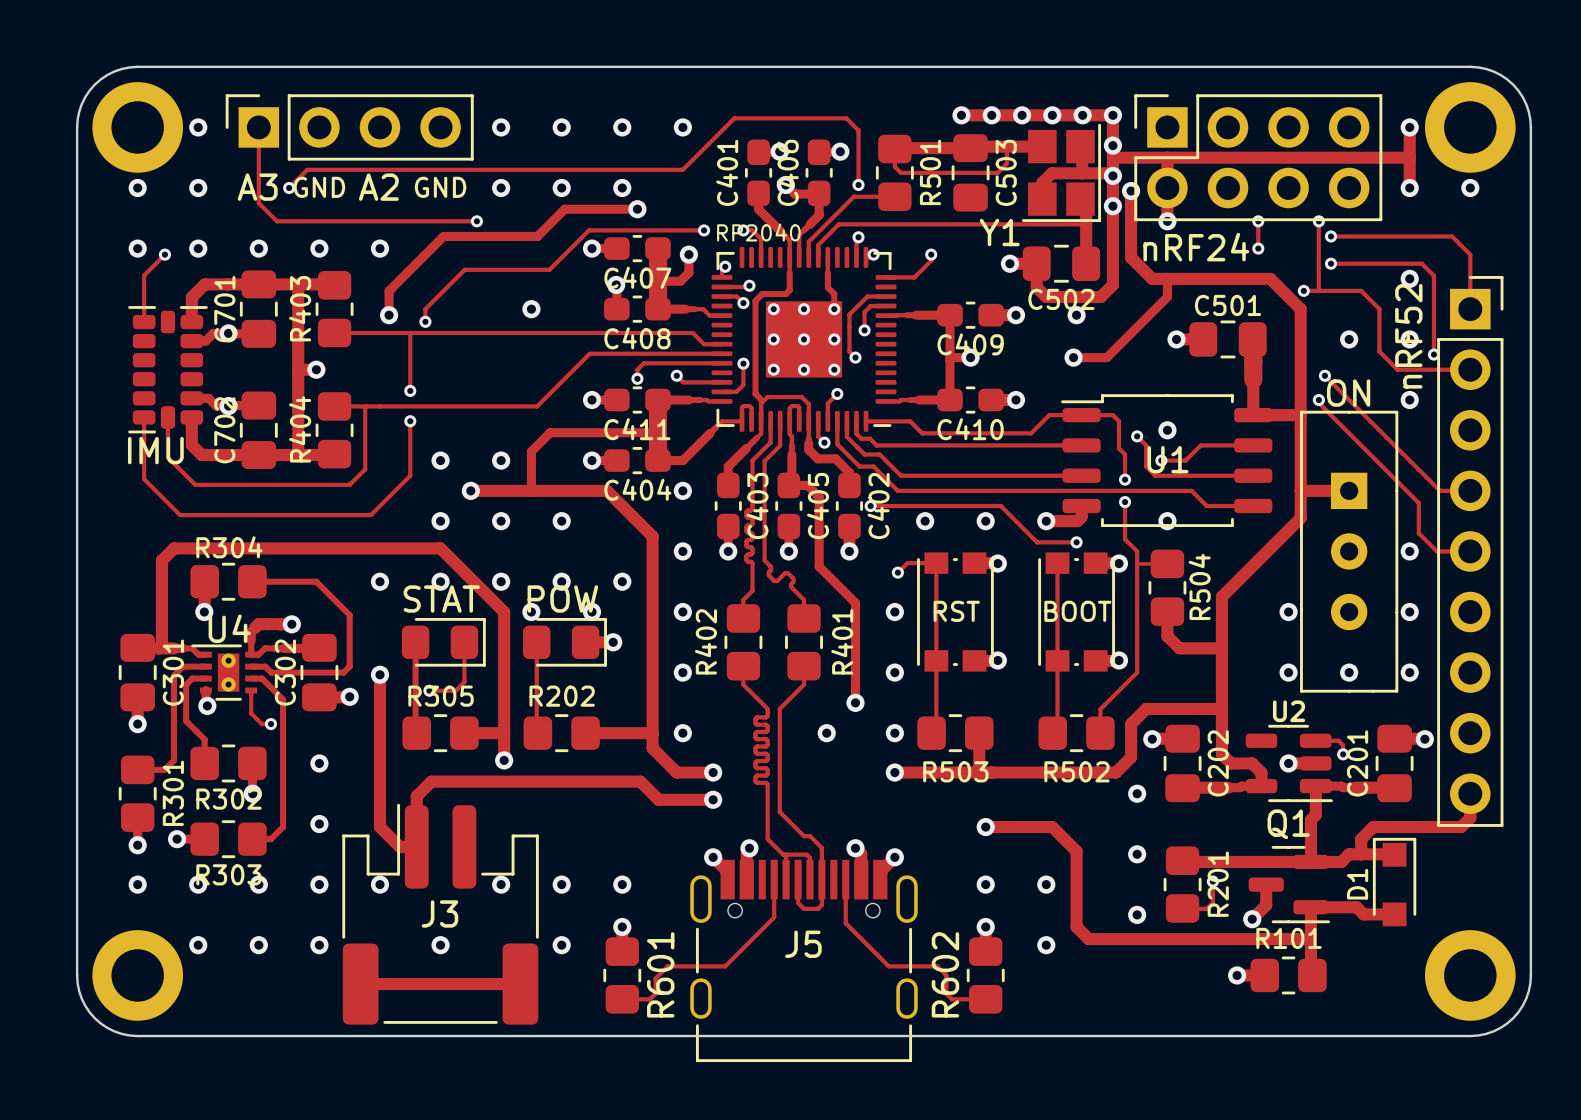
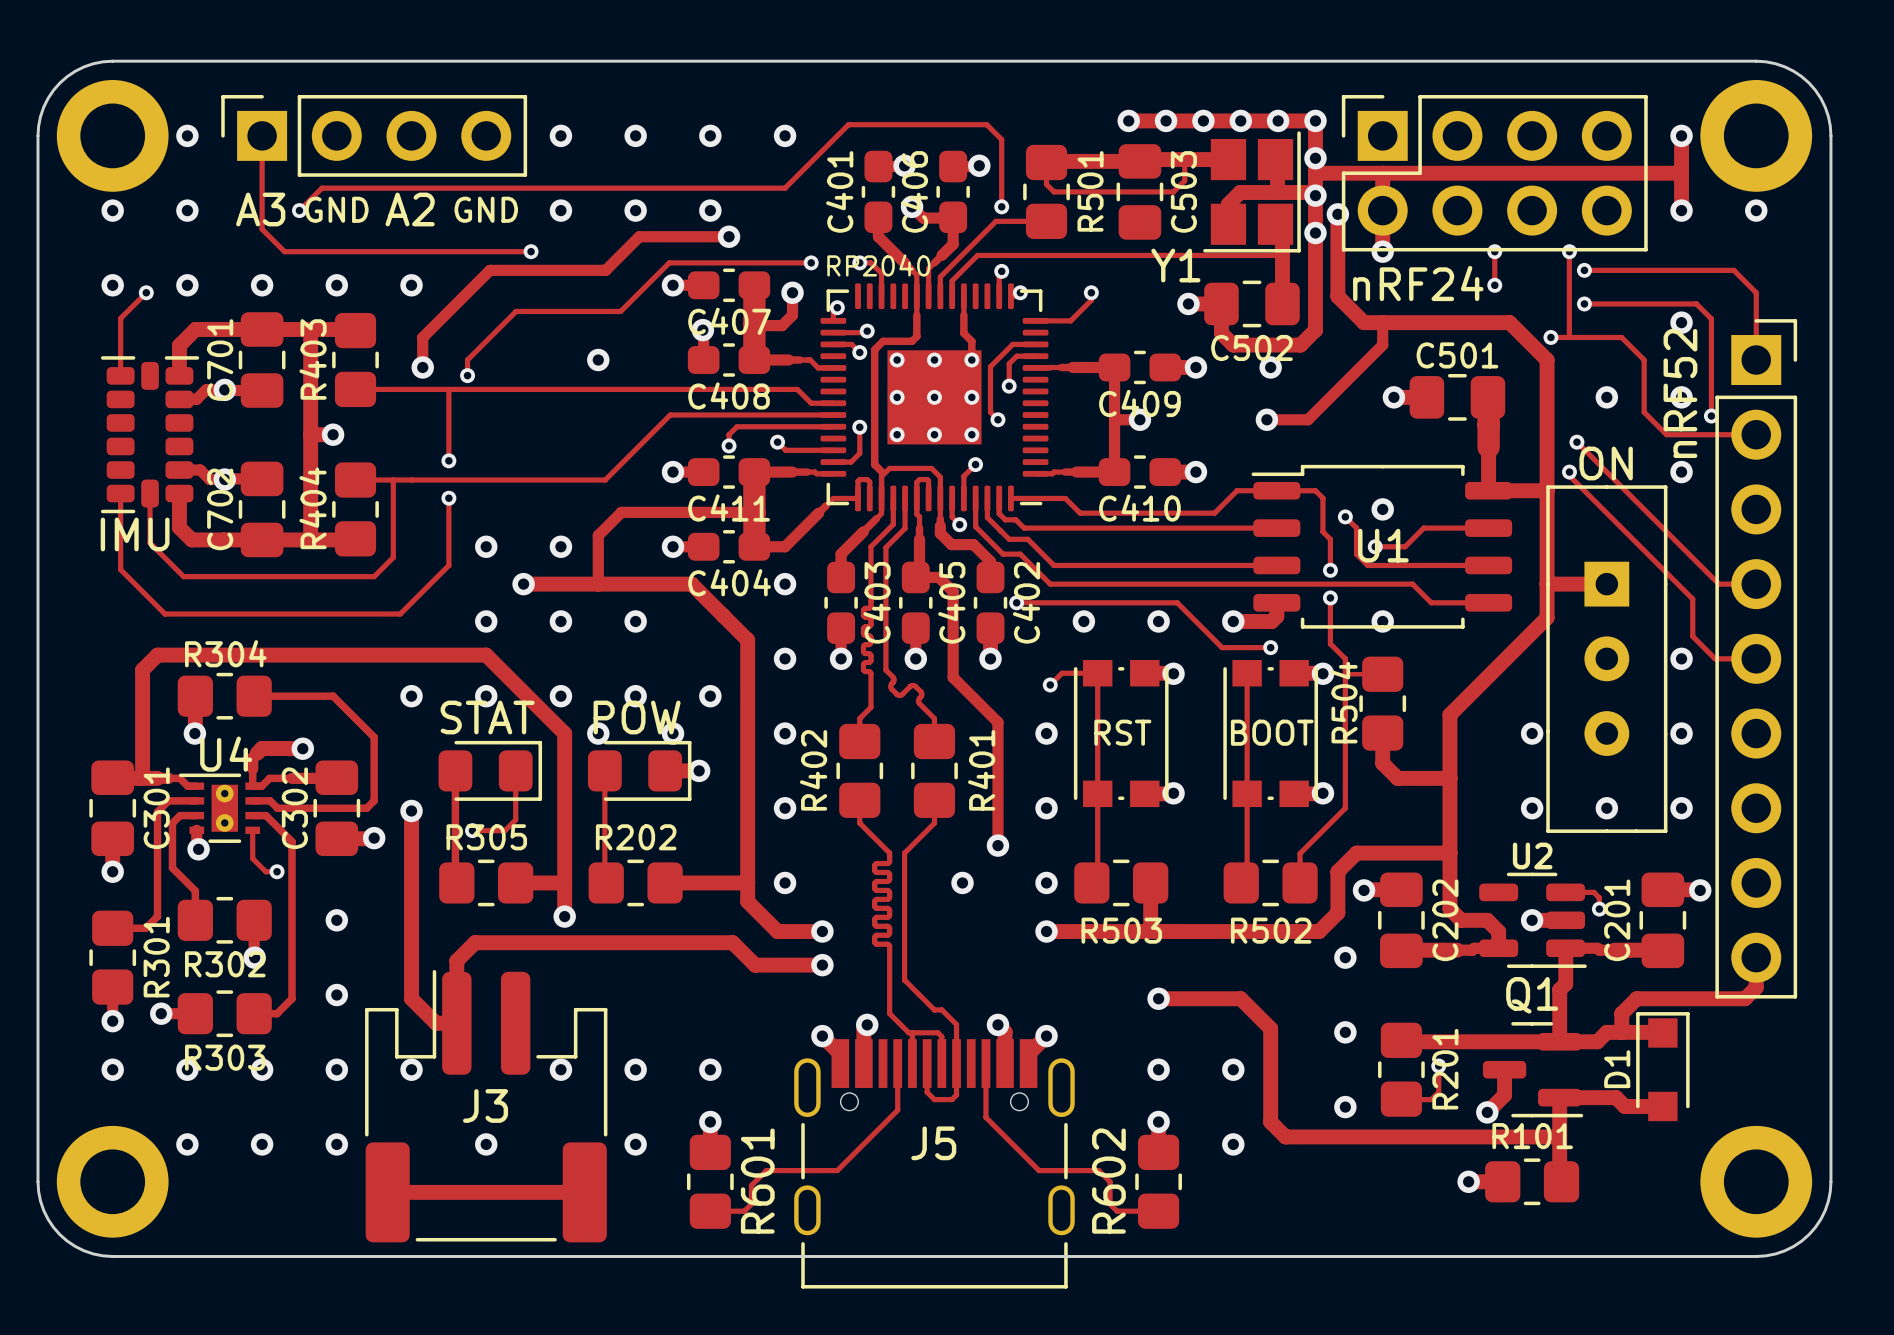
R504 name position: R504 (1199, 586) -> R504 (1343, 702)

